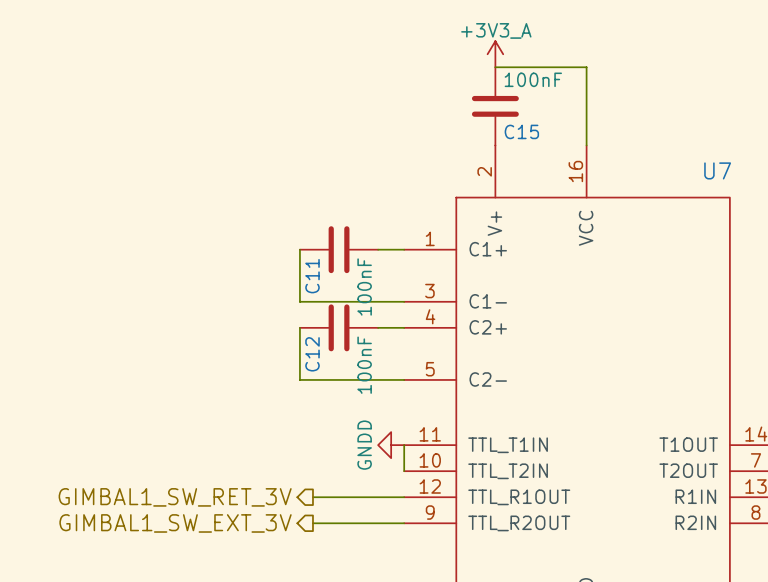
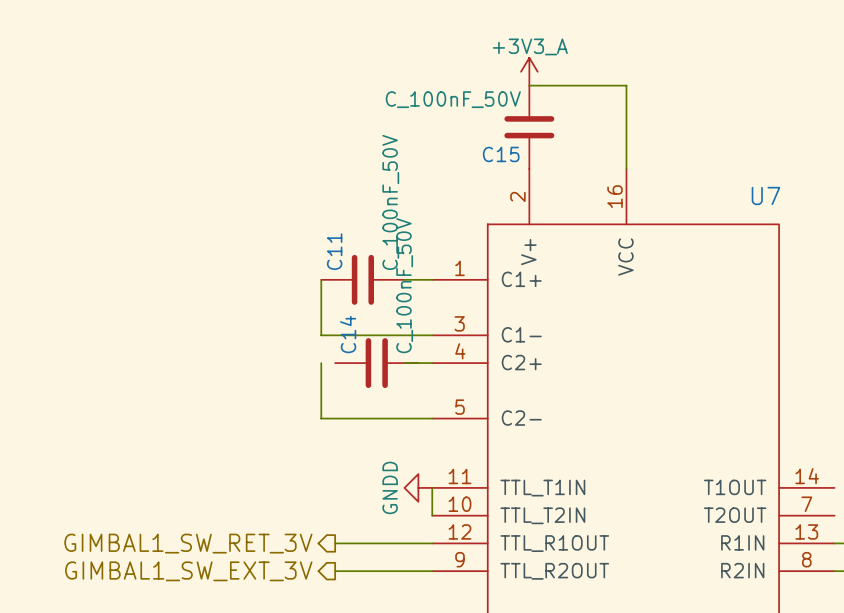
C15 value: 100nF (533, 79) -> C_100nF_50V (453, 99)
C15 name position: C15 (521, 131) -> C15 (501, 154)
C11 name position: C11 (312, 276) -> C11 (334, 251)
C11 value: 100nF (364, 287) -> C_100nF_50V (390, 202)
C12: 100nF (339, 327) -> none
C14: none -> C_100nF_50V (376, 363)

